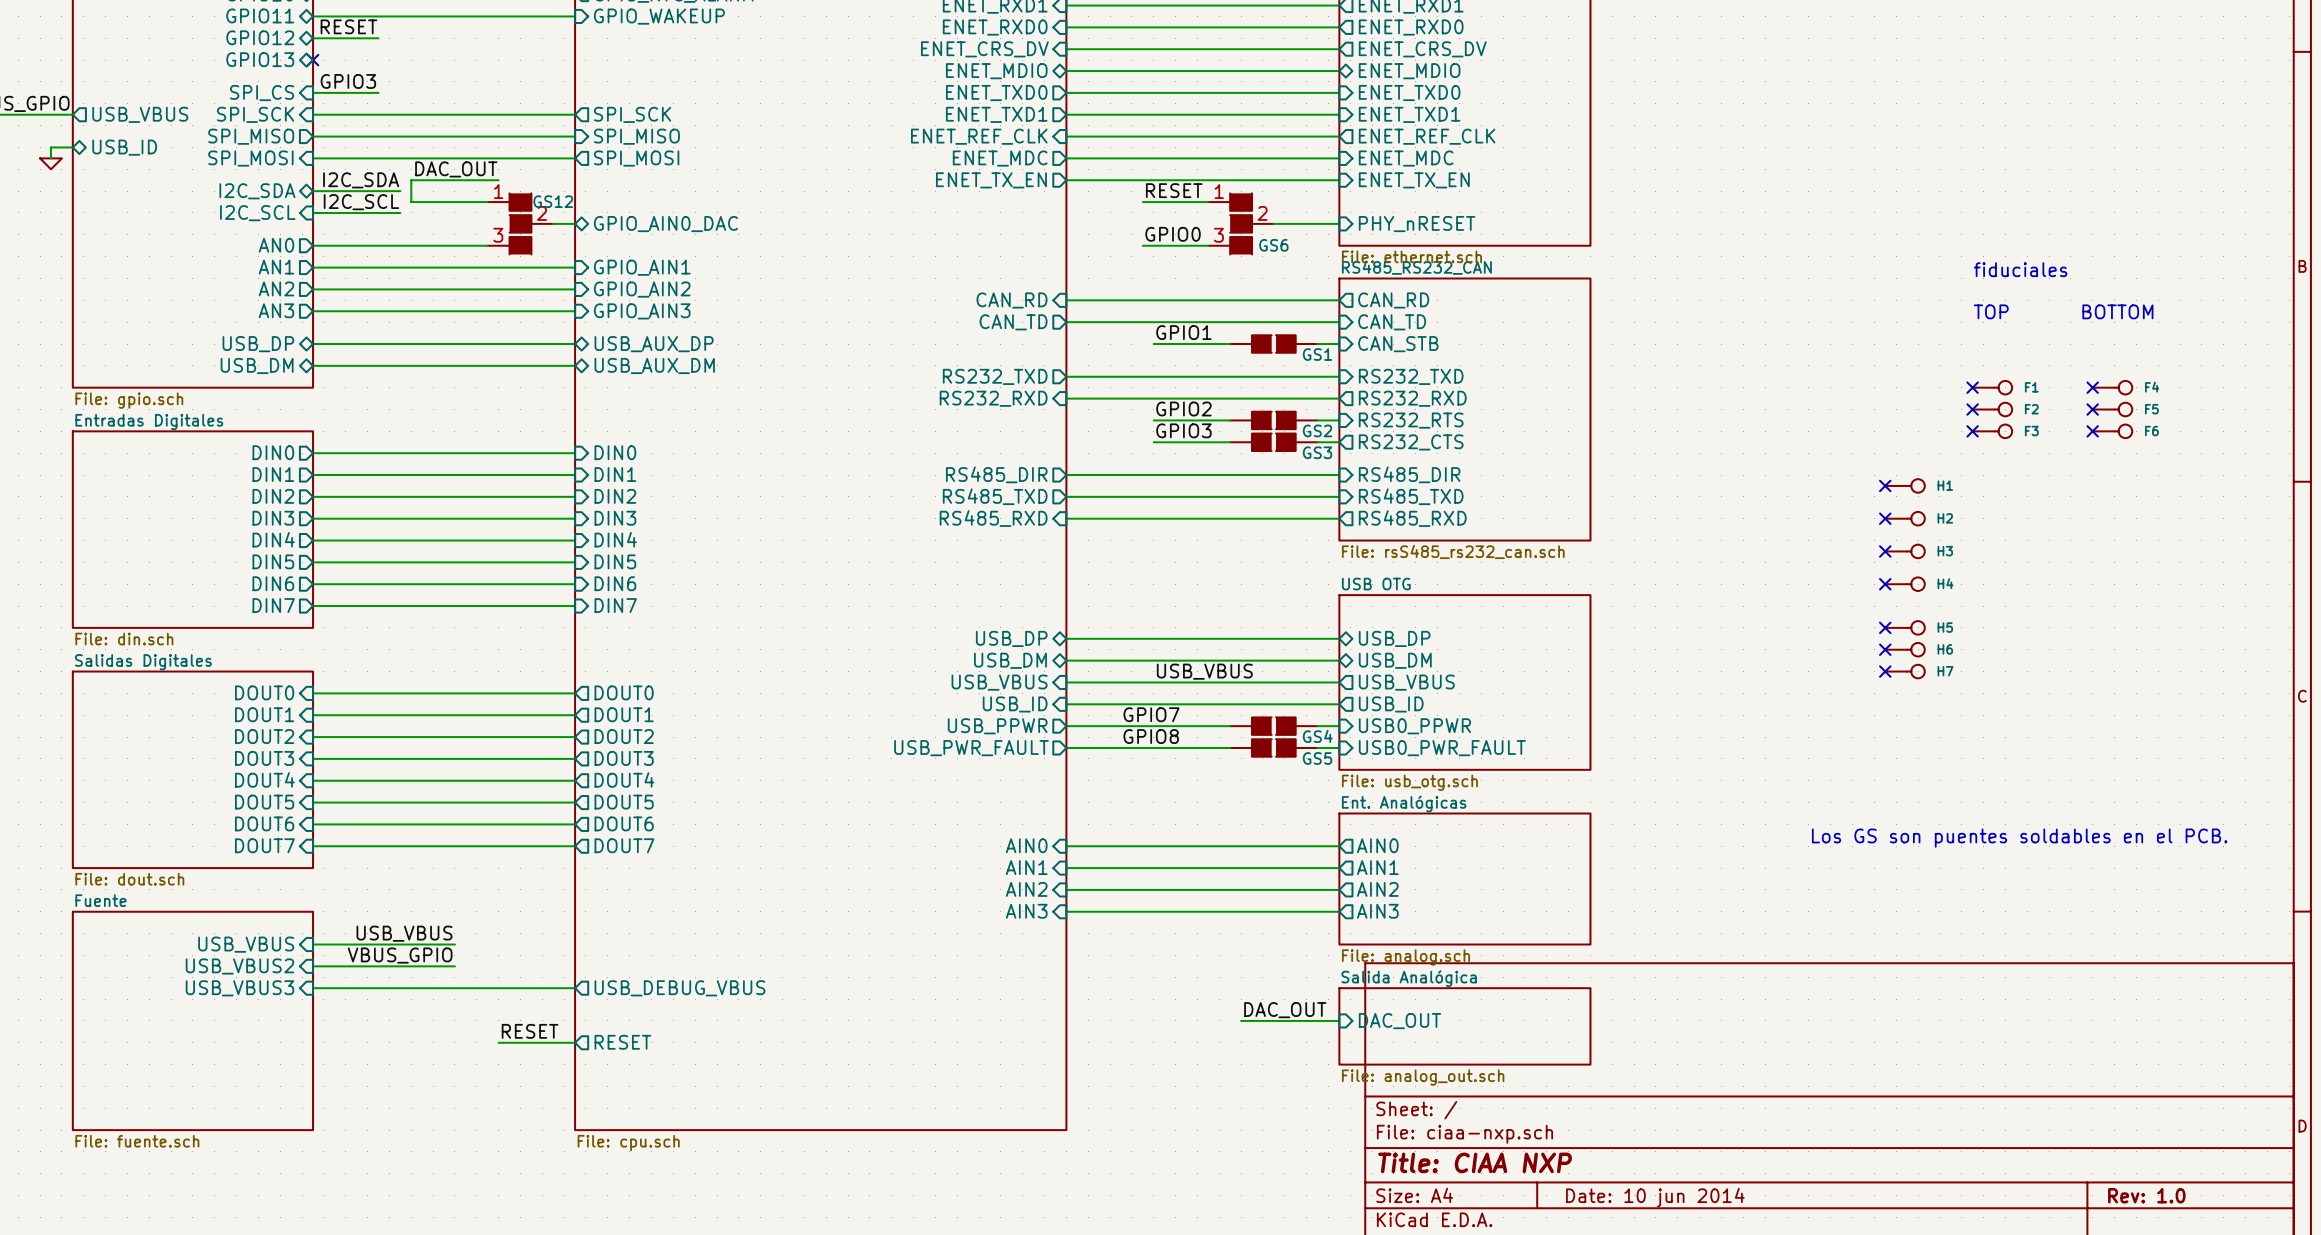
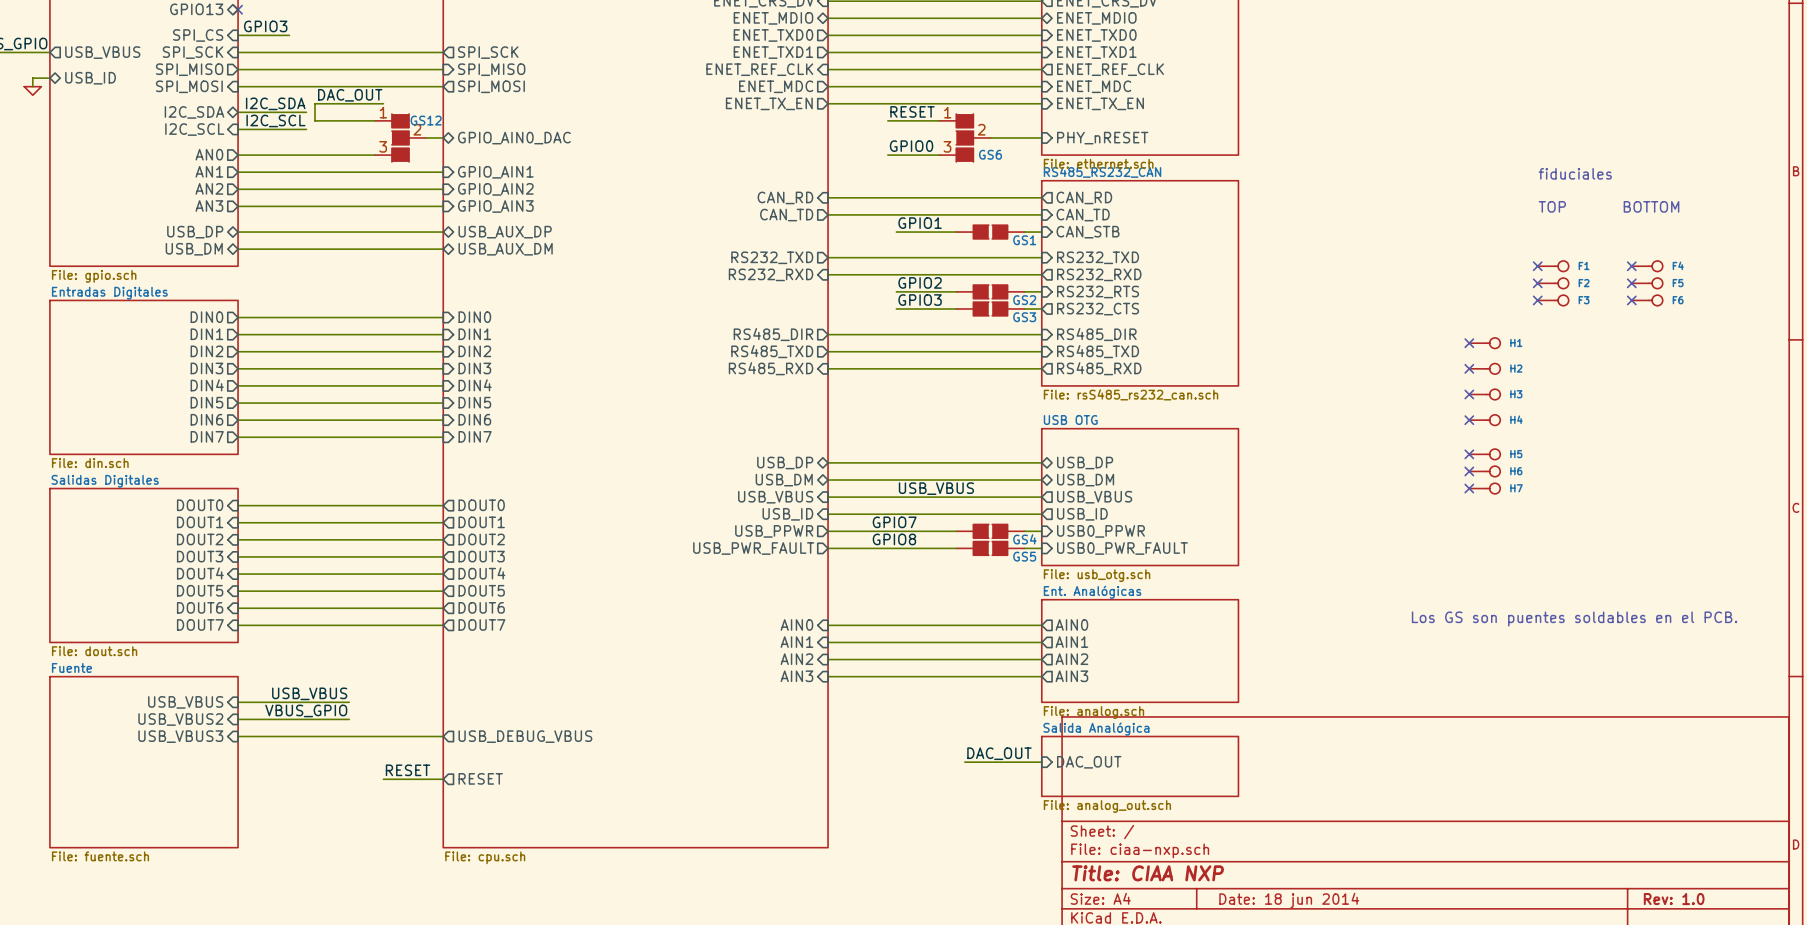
title block: Date: 10 jun 2014 (1655, 1197) -> Date: 18 jun 2014 (1289, 900)

